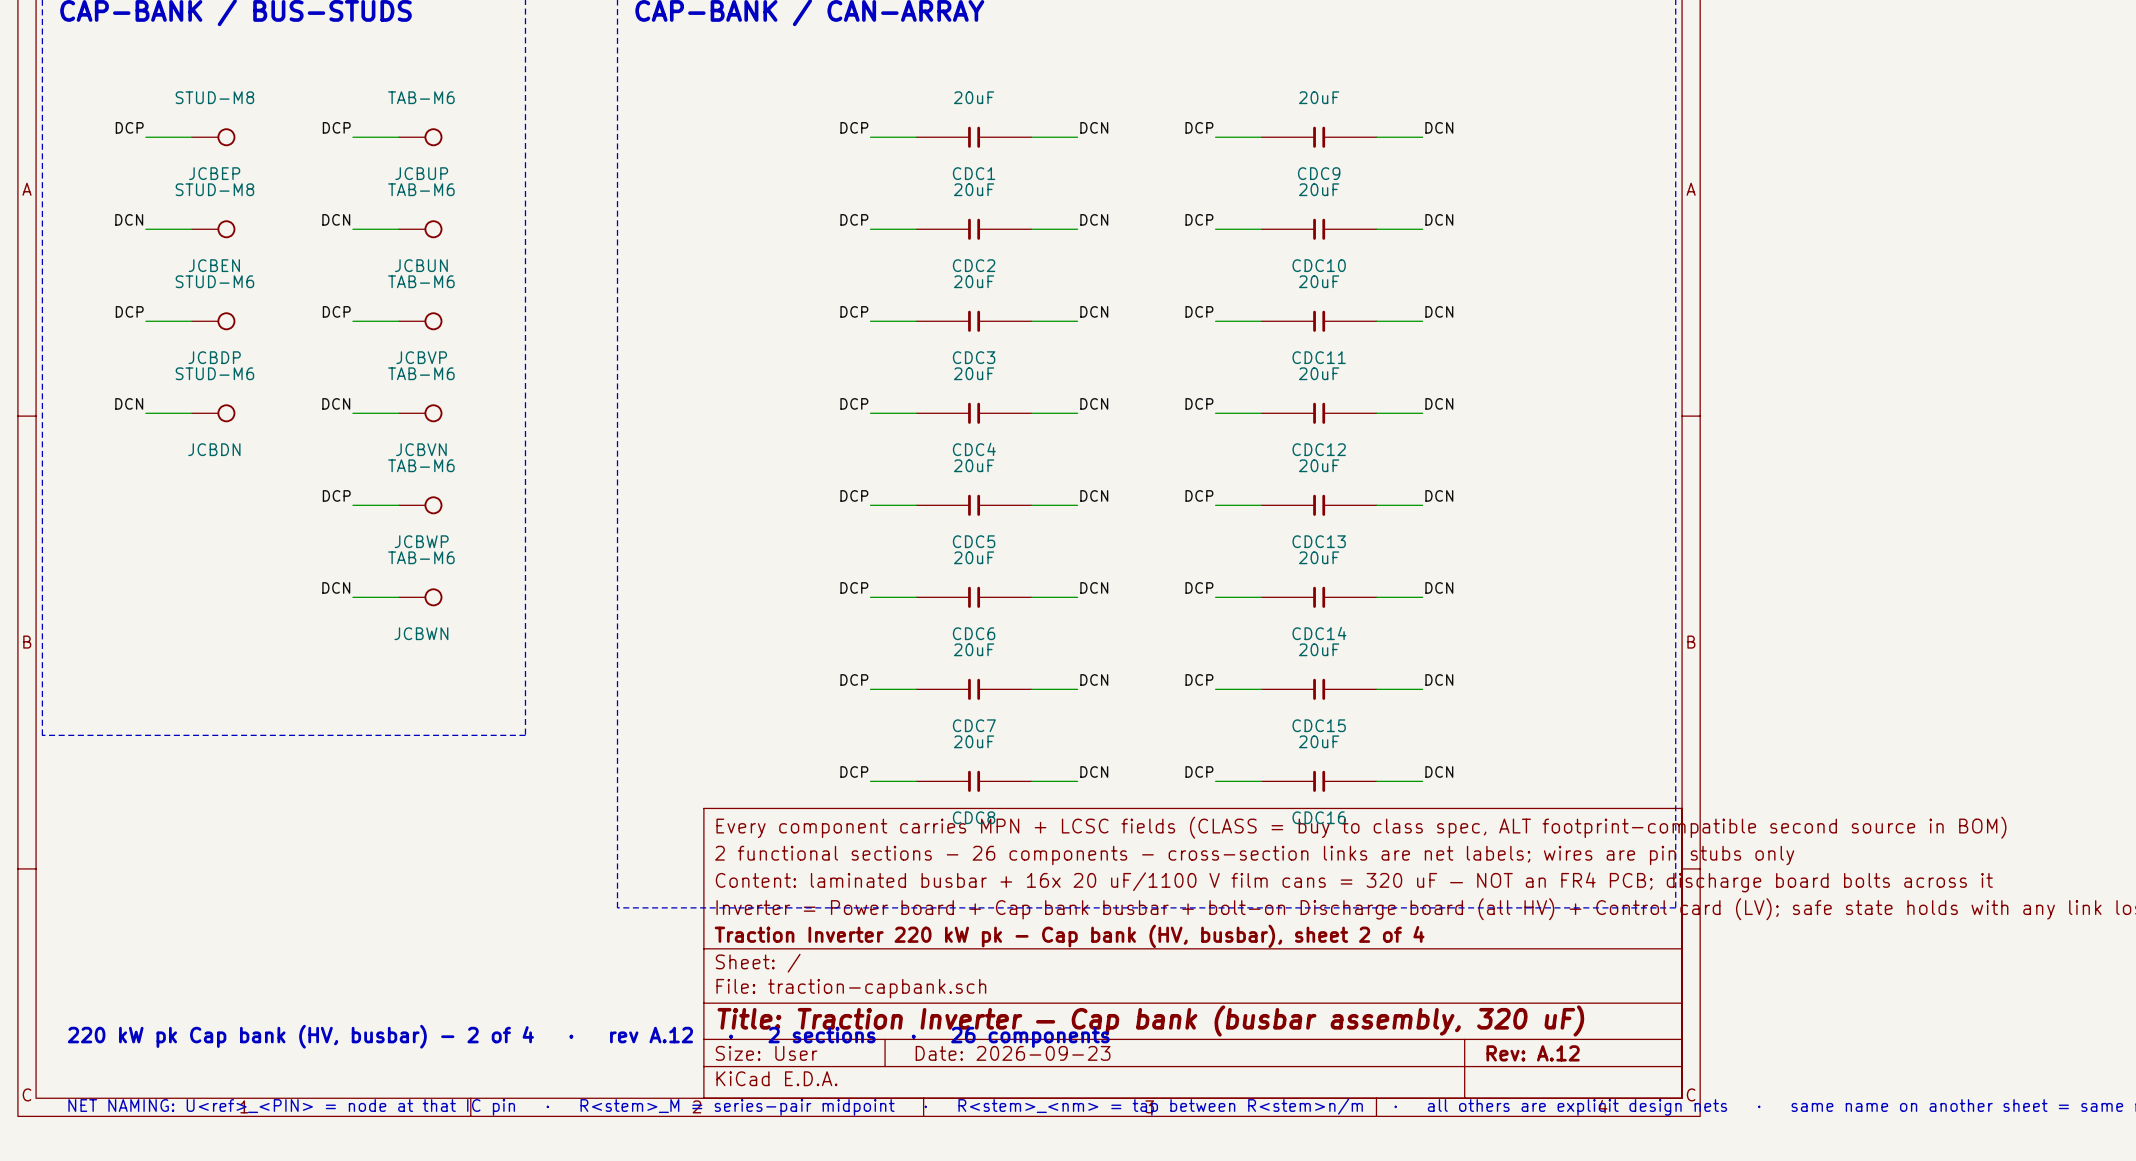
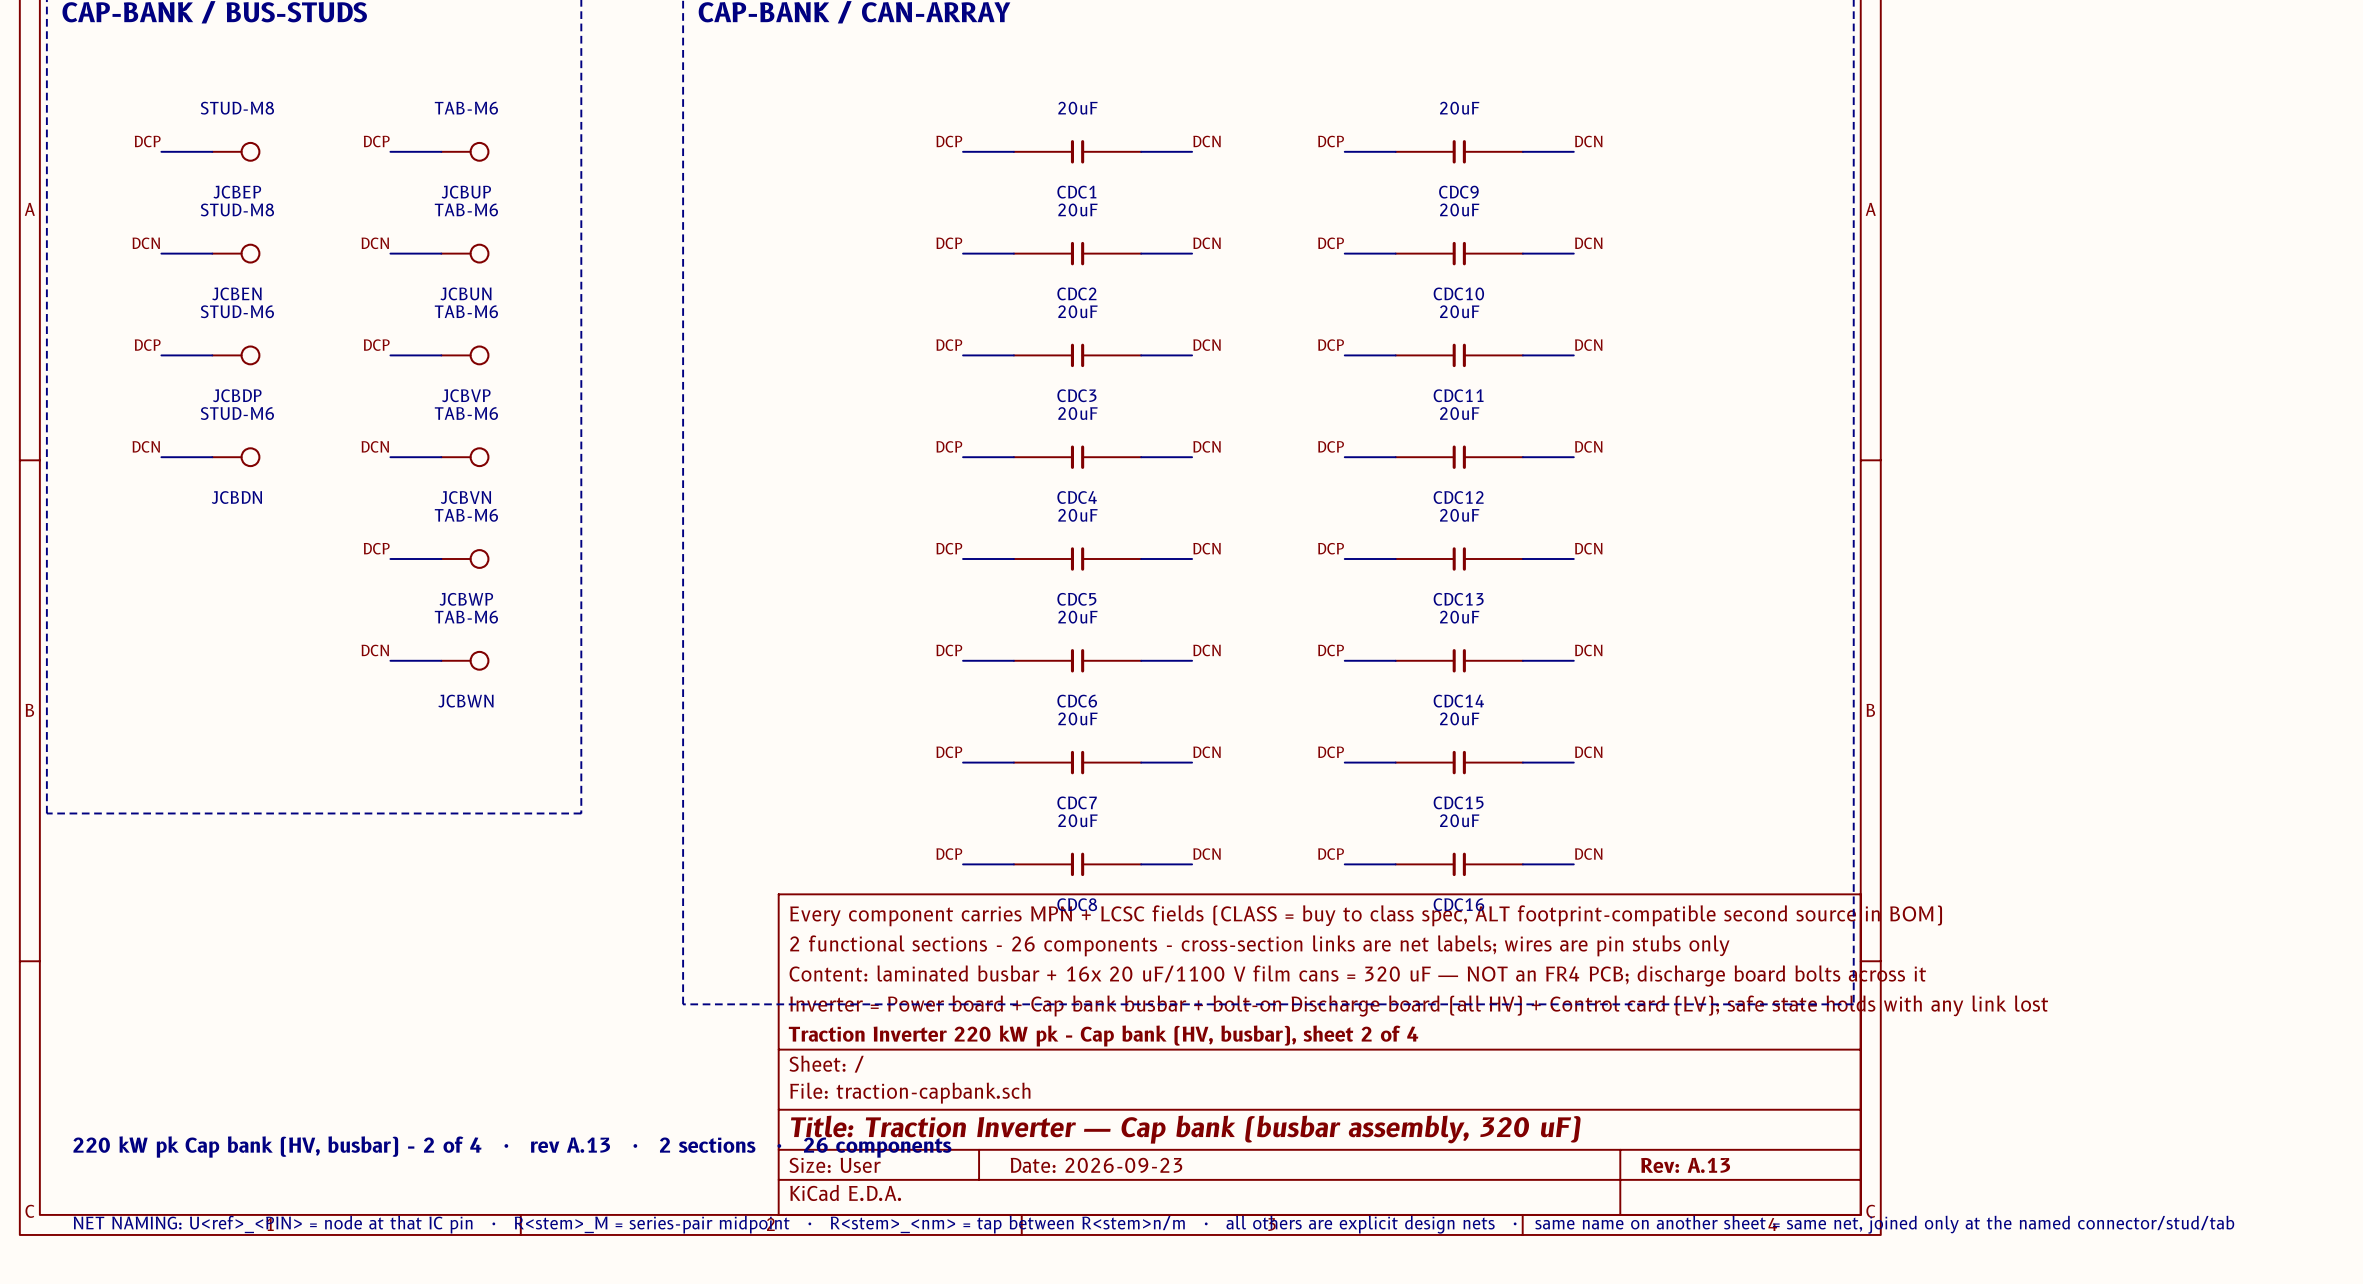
text: 220 kW pk Cap bank (HV, busbar) - 2 of 4 · rev A.12 · 2 sections · 26 components (588, 1036) -> 220 kW pk Cap bank (HV, busbar) - 2 of 4 · rev A.13 · 2 sections · 26 components (512, 1147)
title block: Rev: A.12 (1533, 1053) -> Rev: A.13 (1685, 1165)

